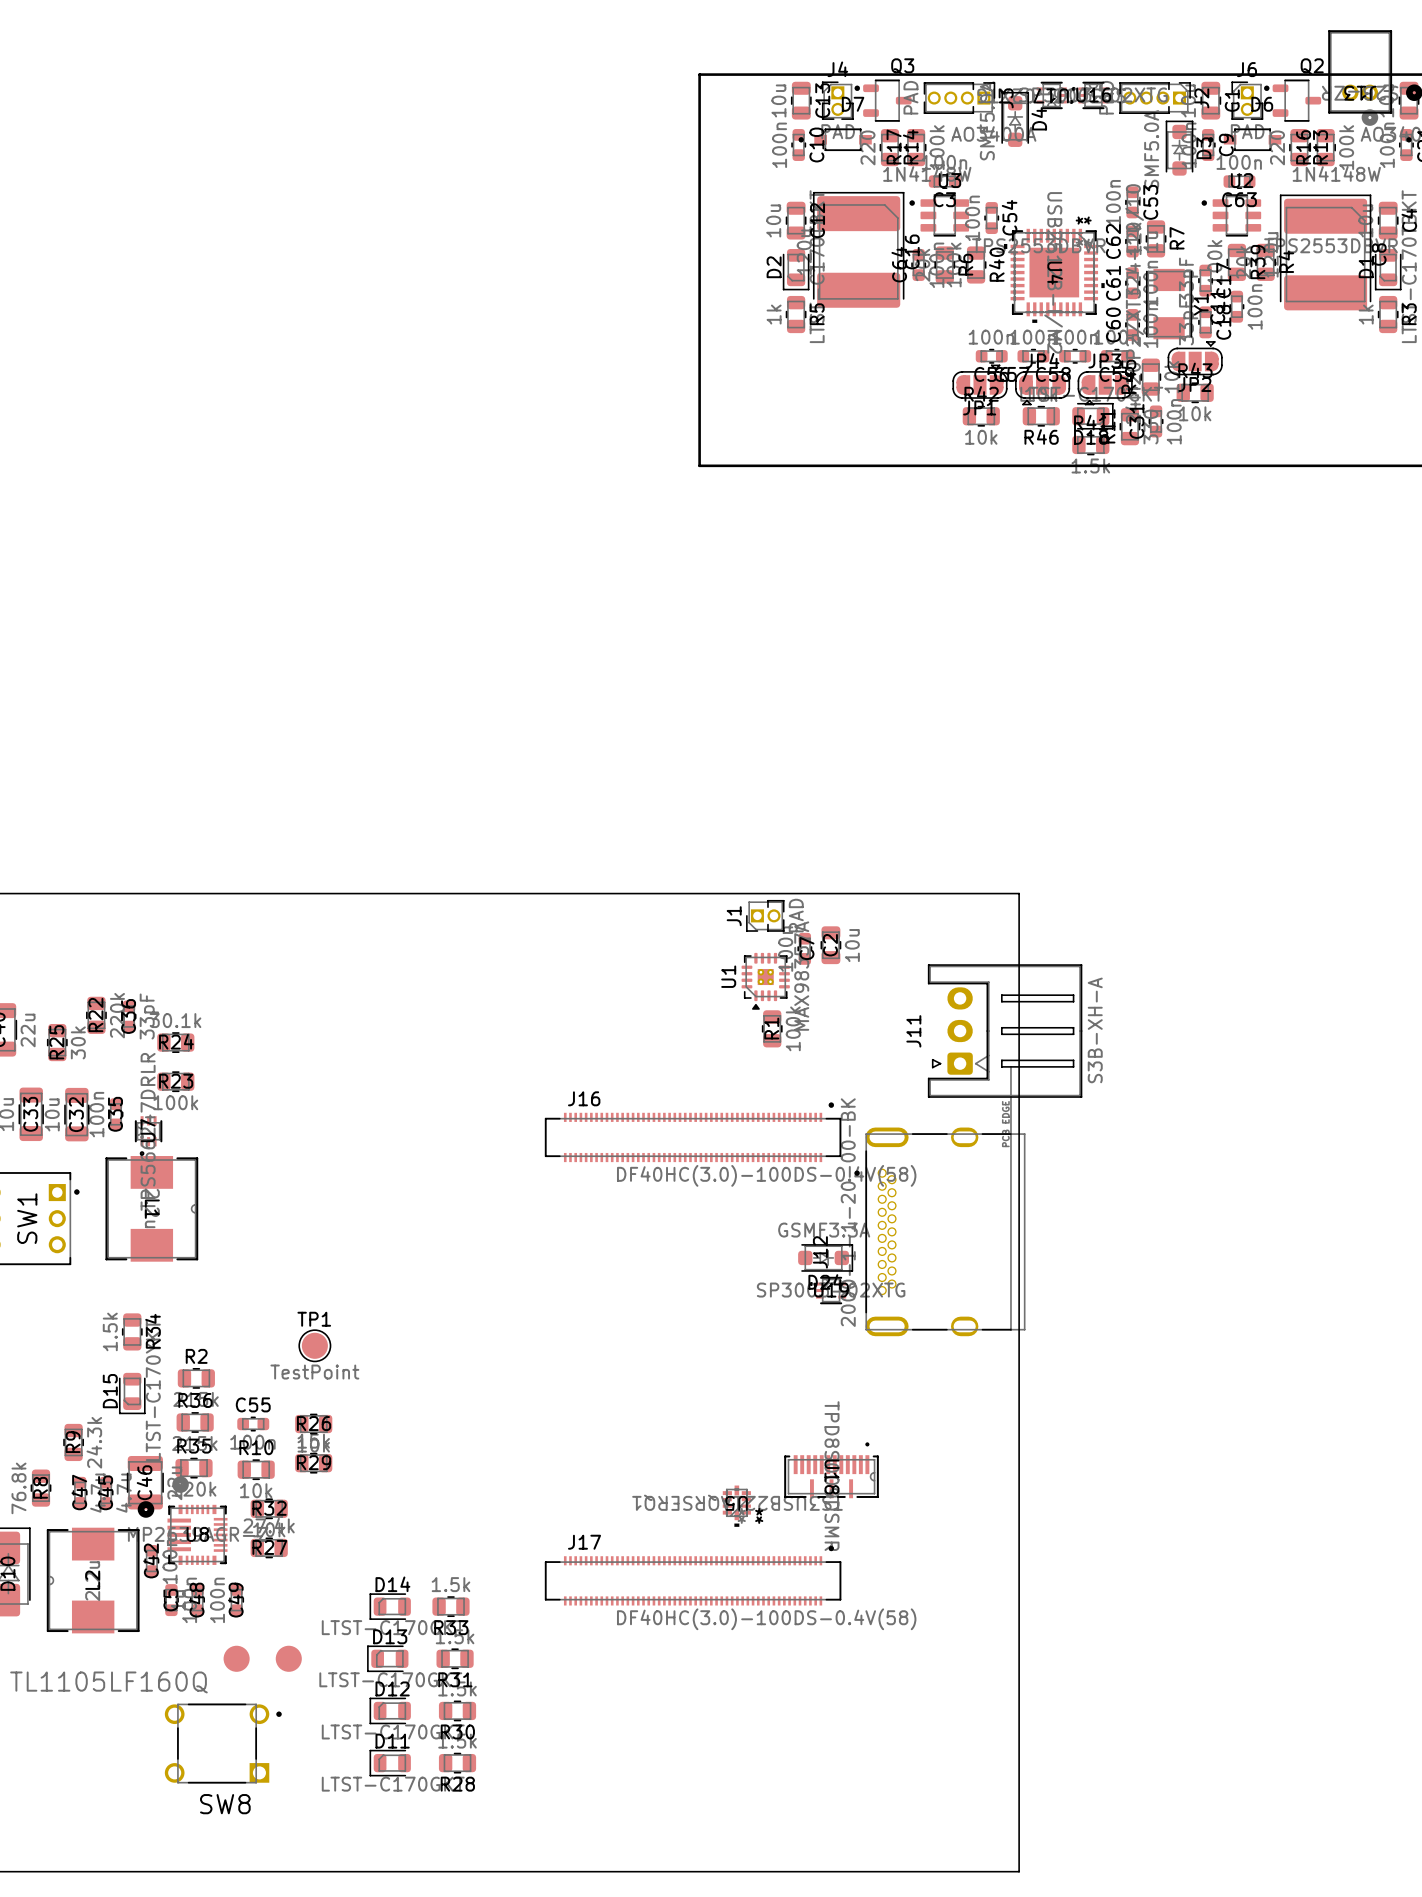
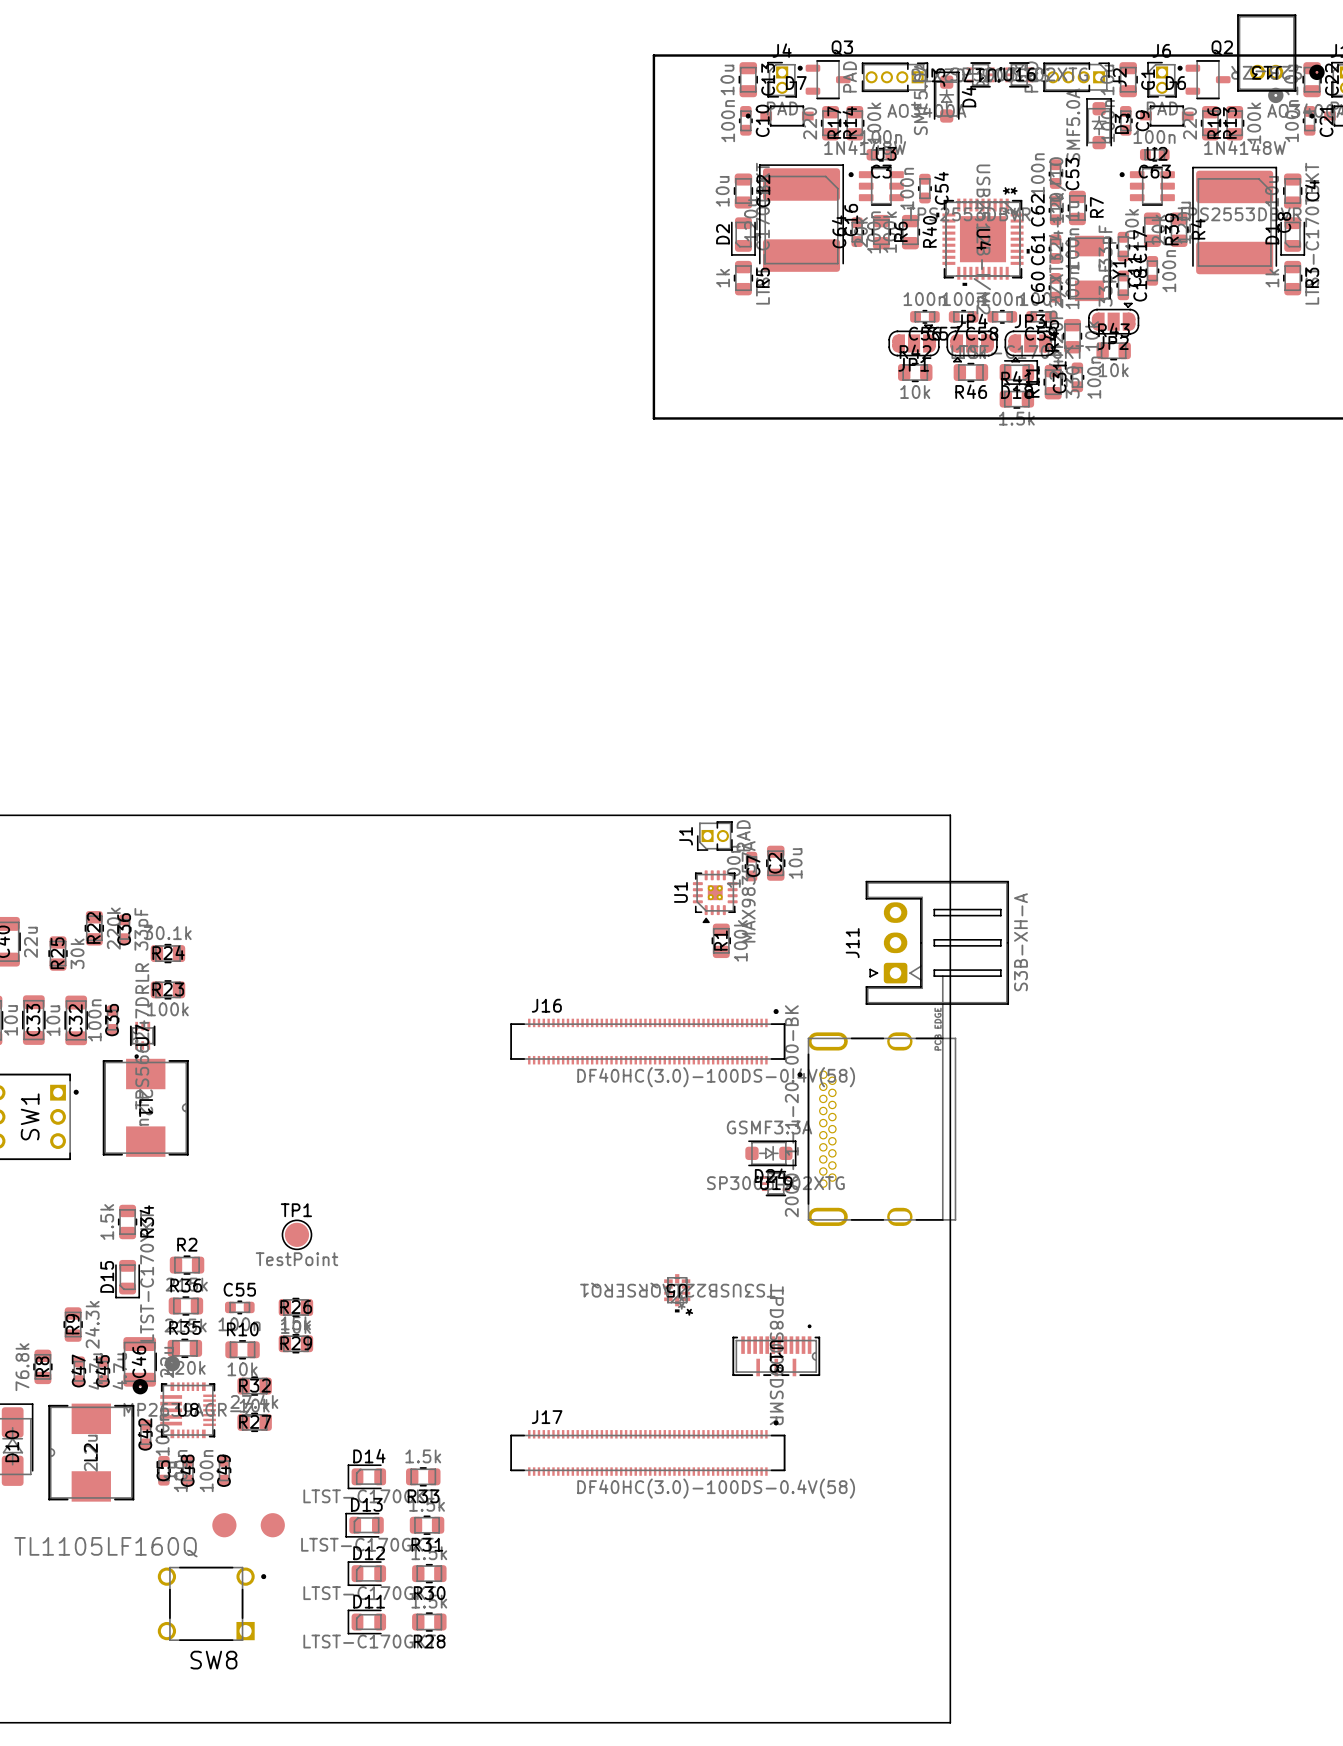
J12 name: J12 (820, 1252) -> none
text: none -> * (689, 1312)
U5 footprint: [722, 1485, 751, 1527] -> [664, 1274, 691, 1313]

